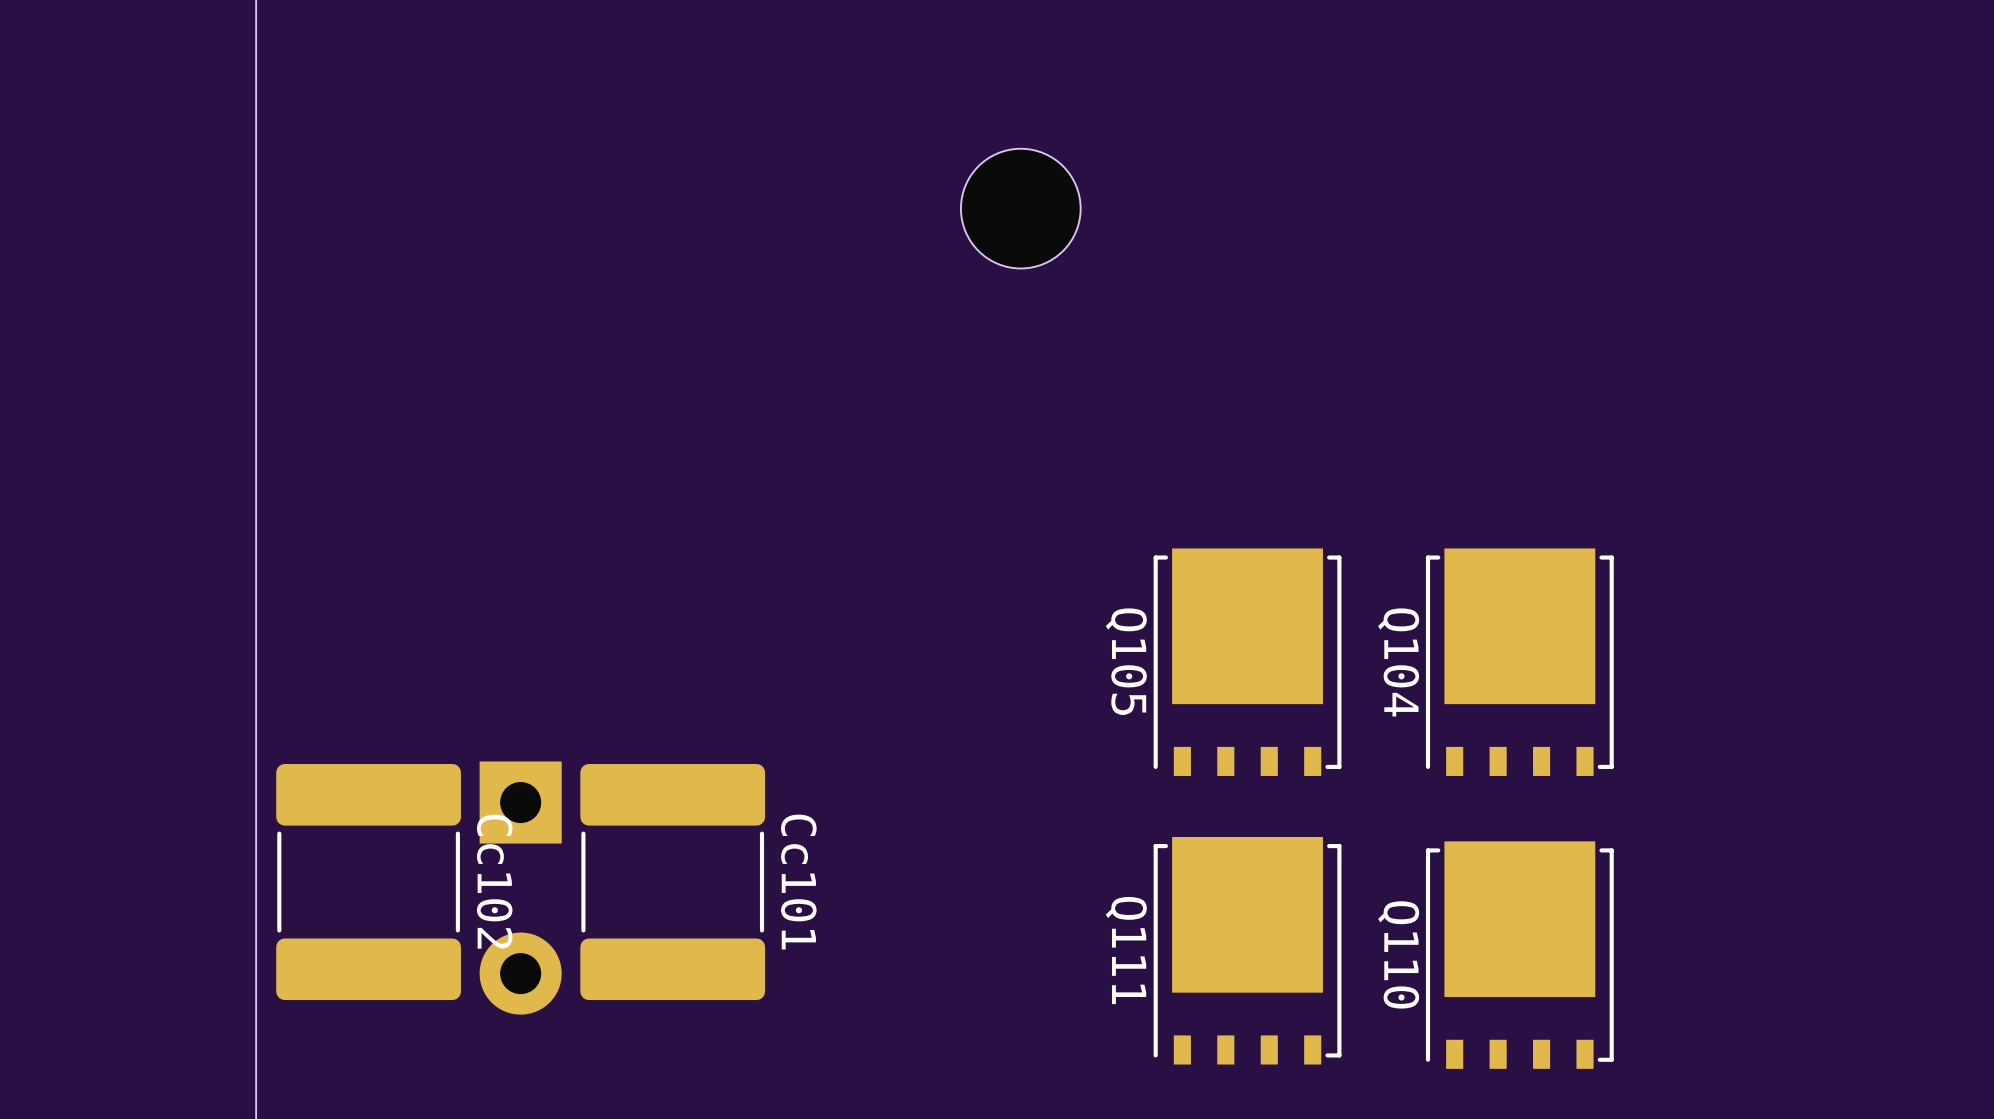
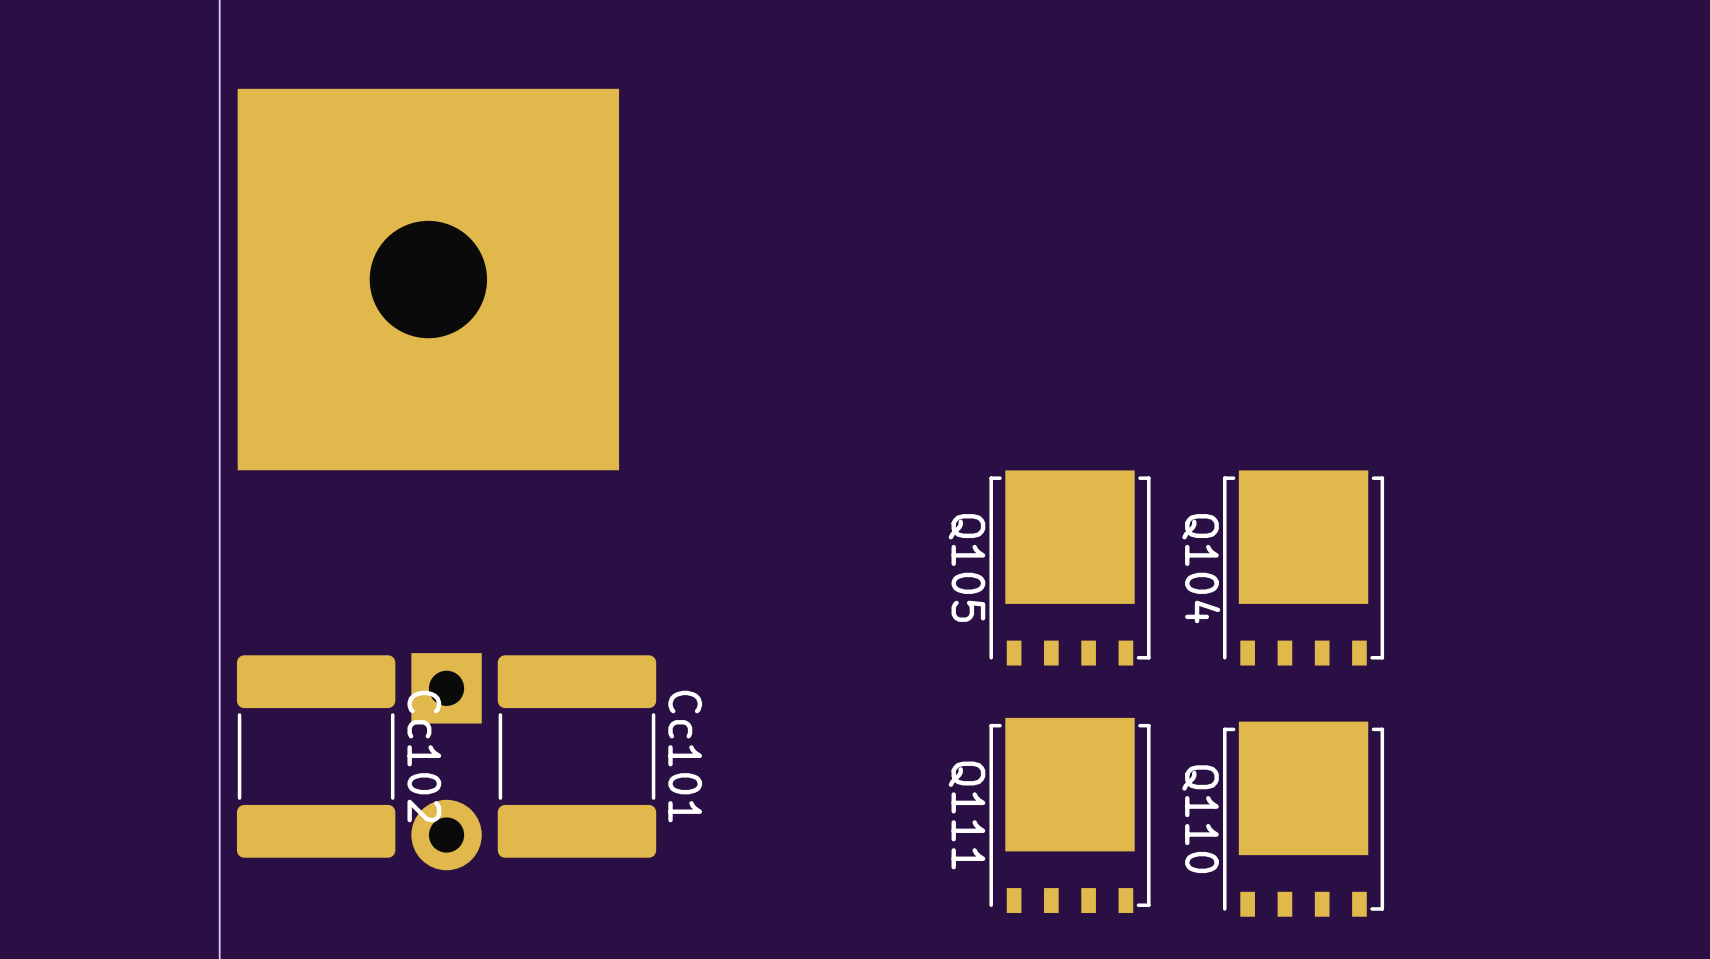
part: (1020, 208) -> none
part: none -> (428, 279)

